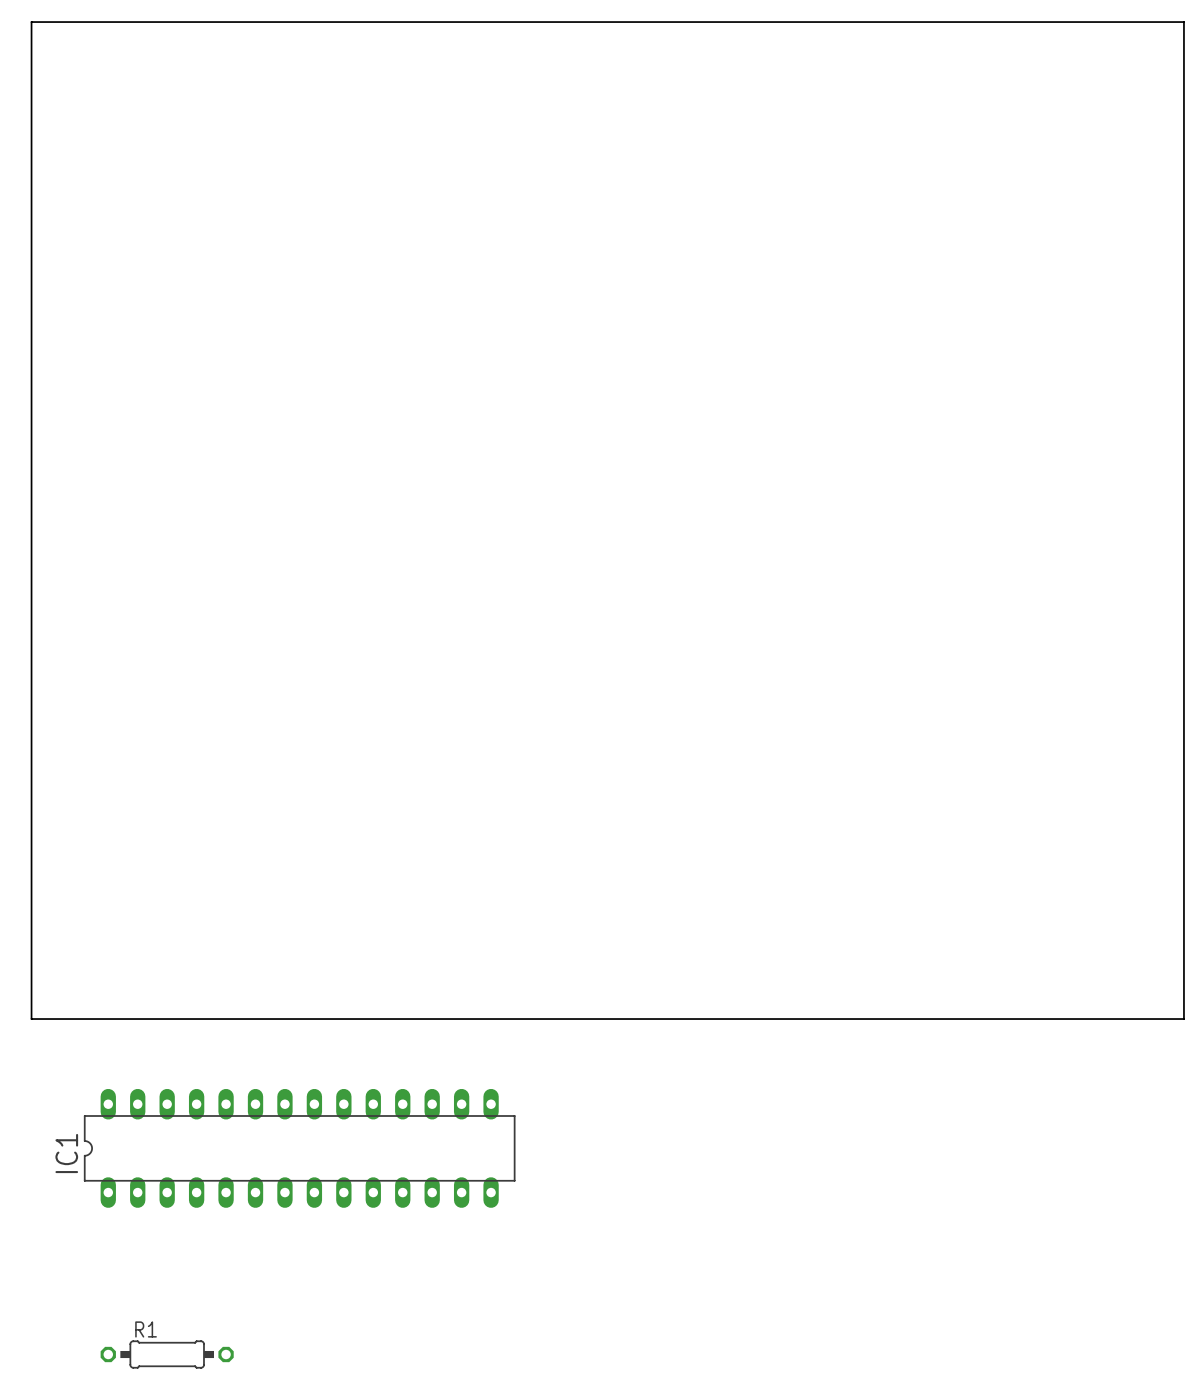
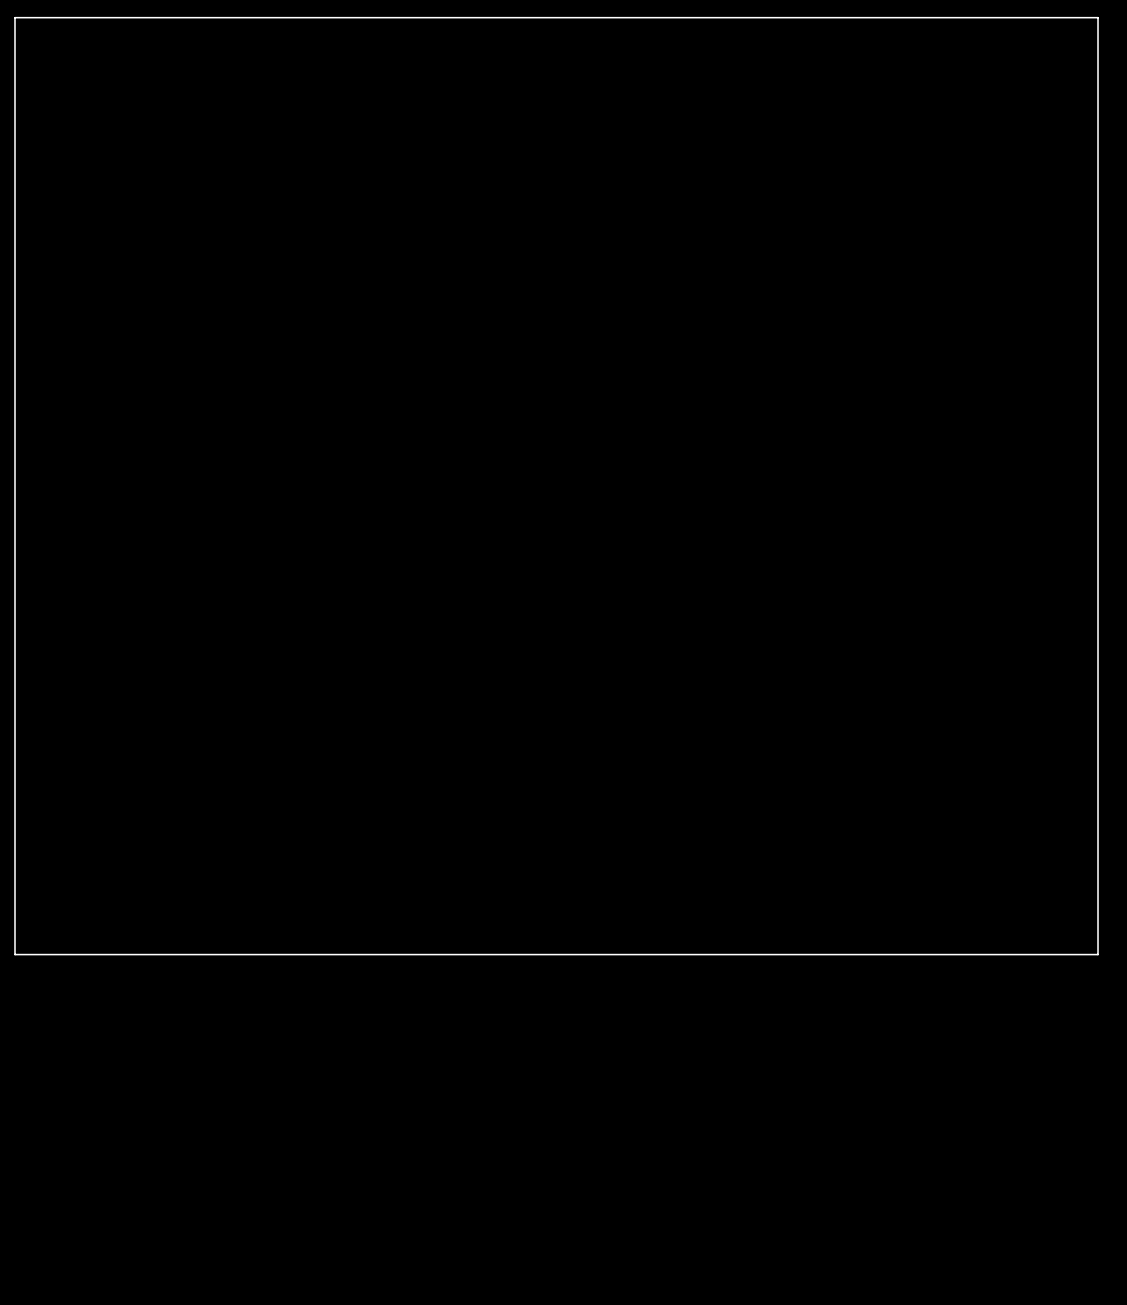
IC1: (299, 1148) -> none
R1: (167, 1354) -> none

